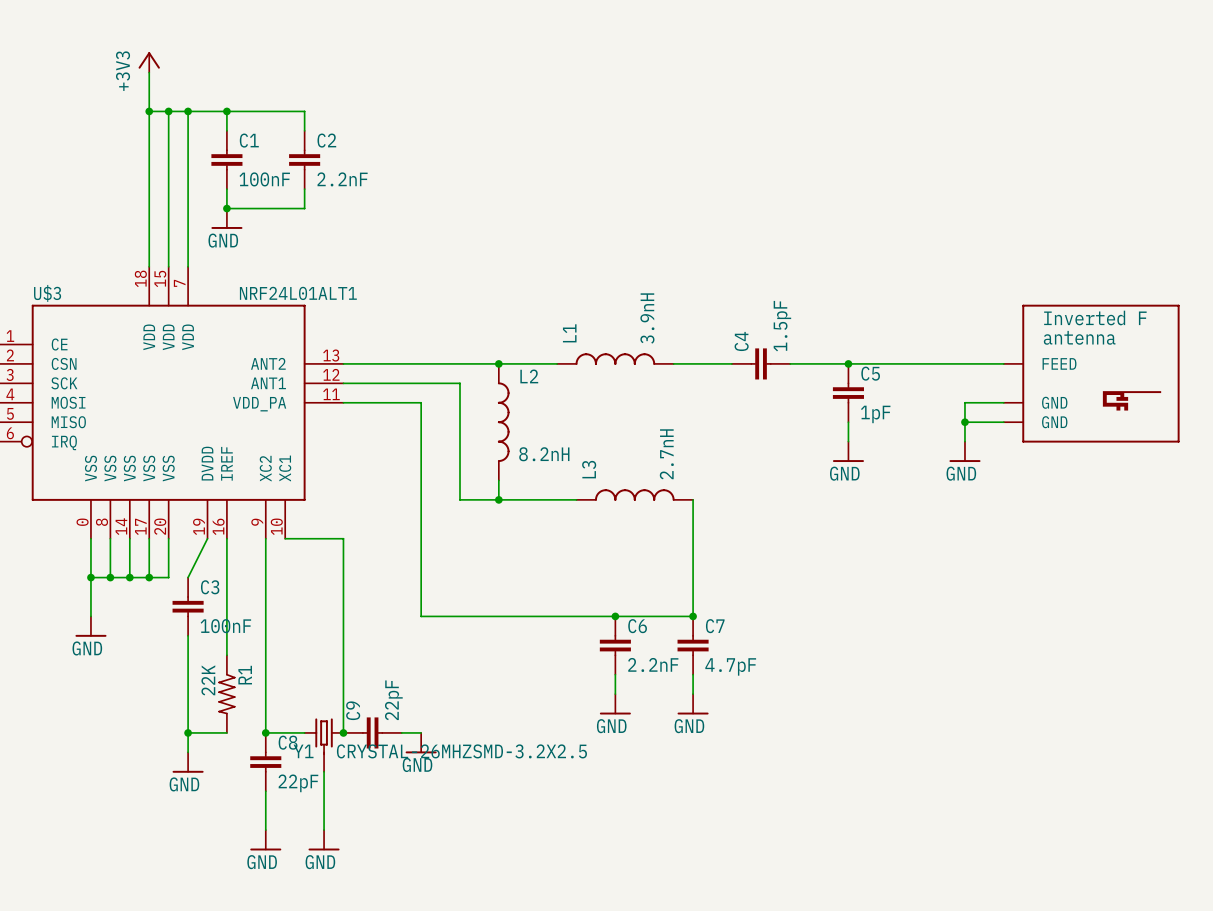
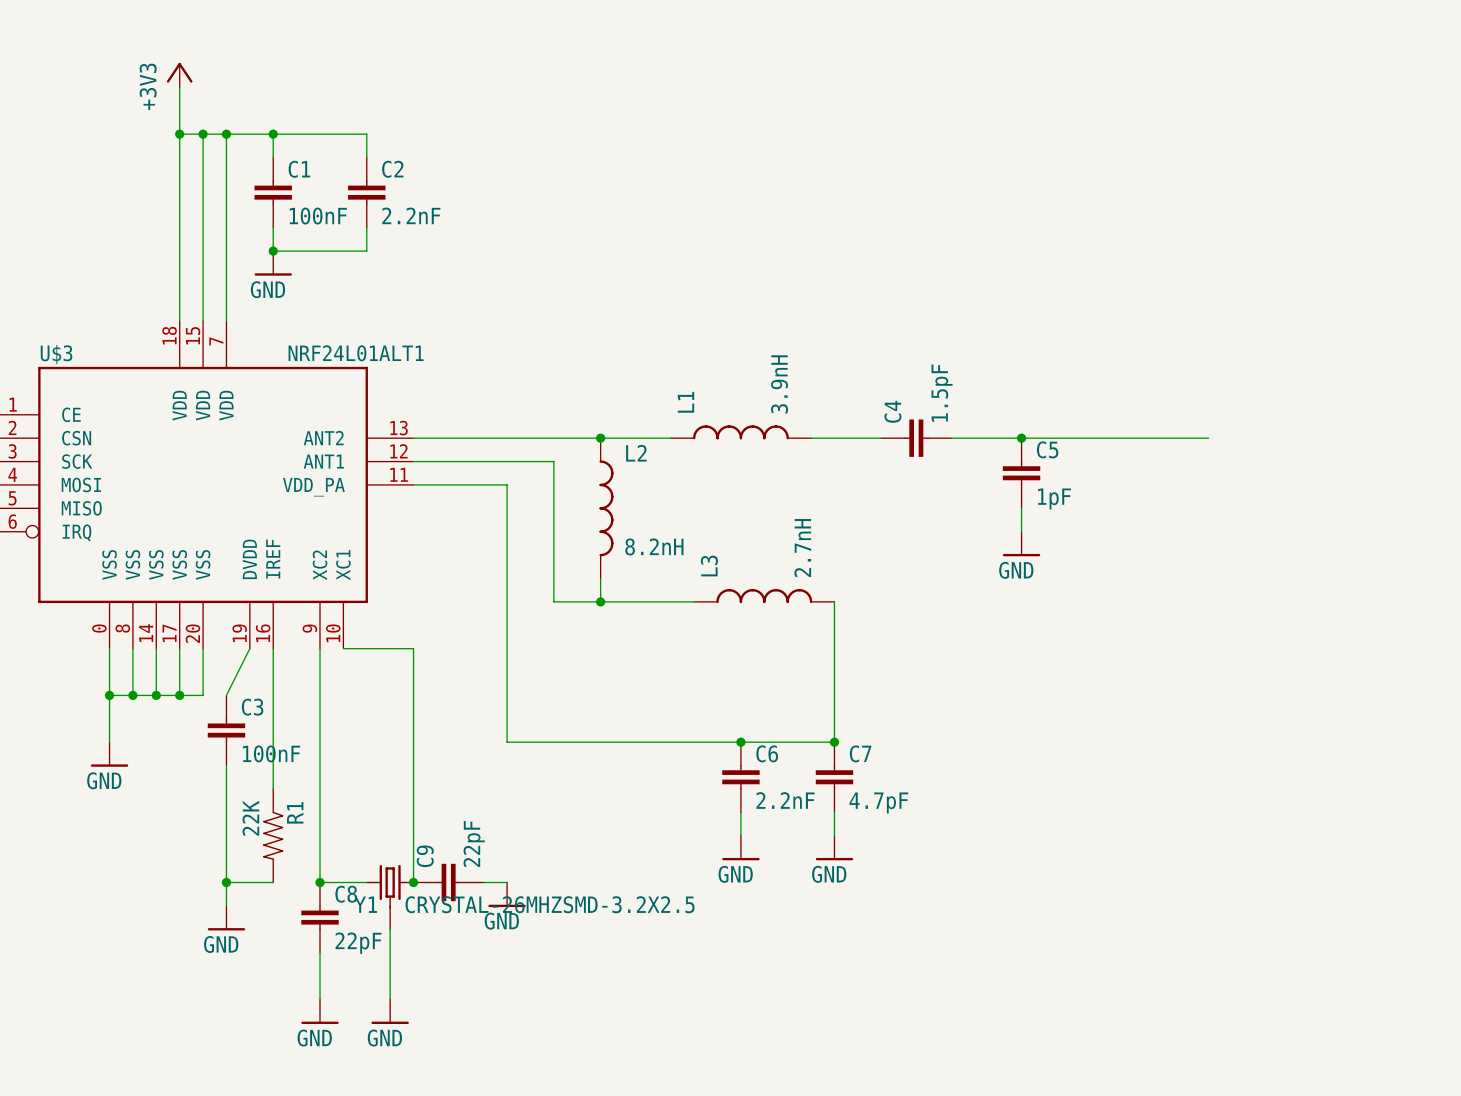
part: (1091, 373) -> none
wire: (1003, 402) (964, 402) (964, 441) -> none
wire: (964, 422) (1003, 422) -> none
junction: (964, 422) -> none
power symbol: GND (964, 451) -> none

